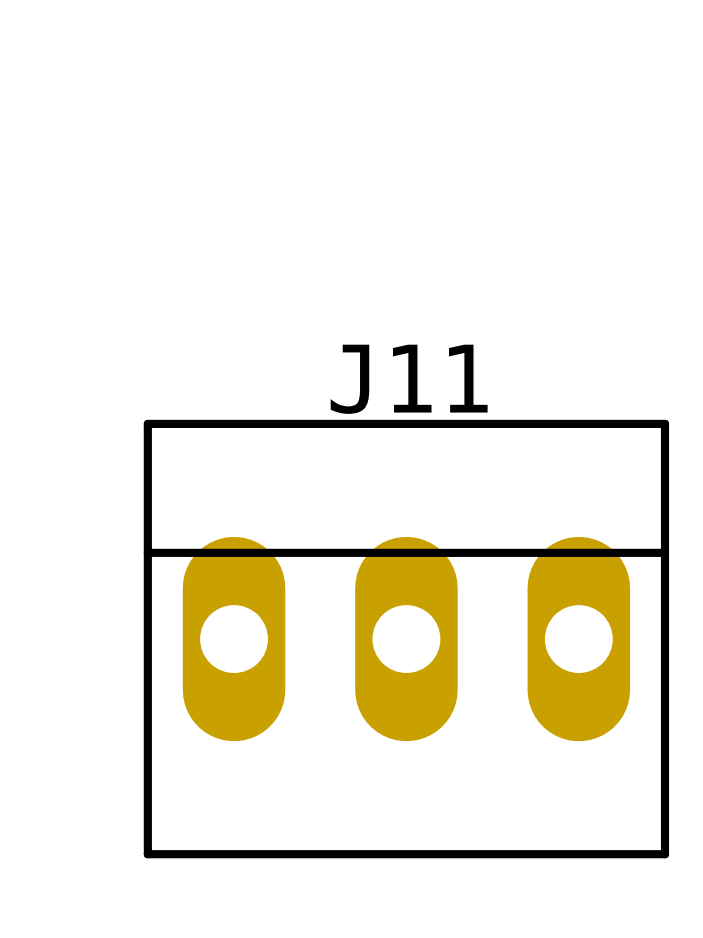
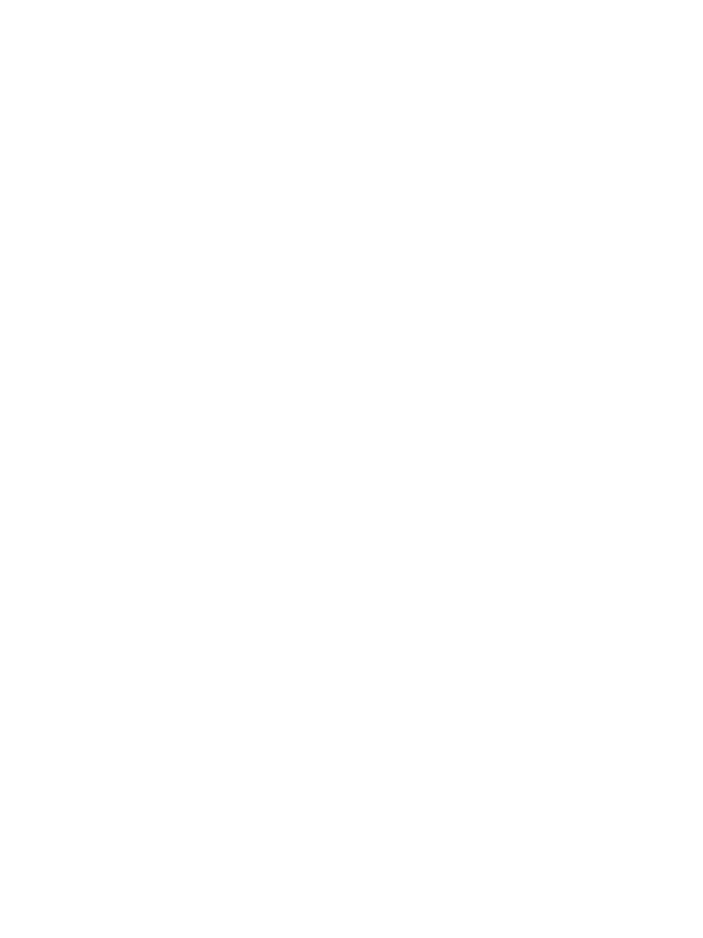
J11: (406, 639) -> none

